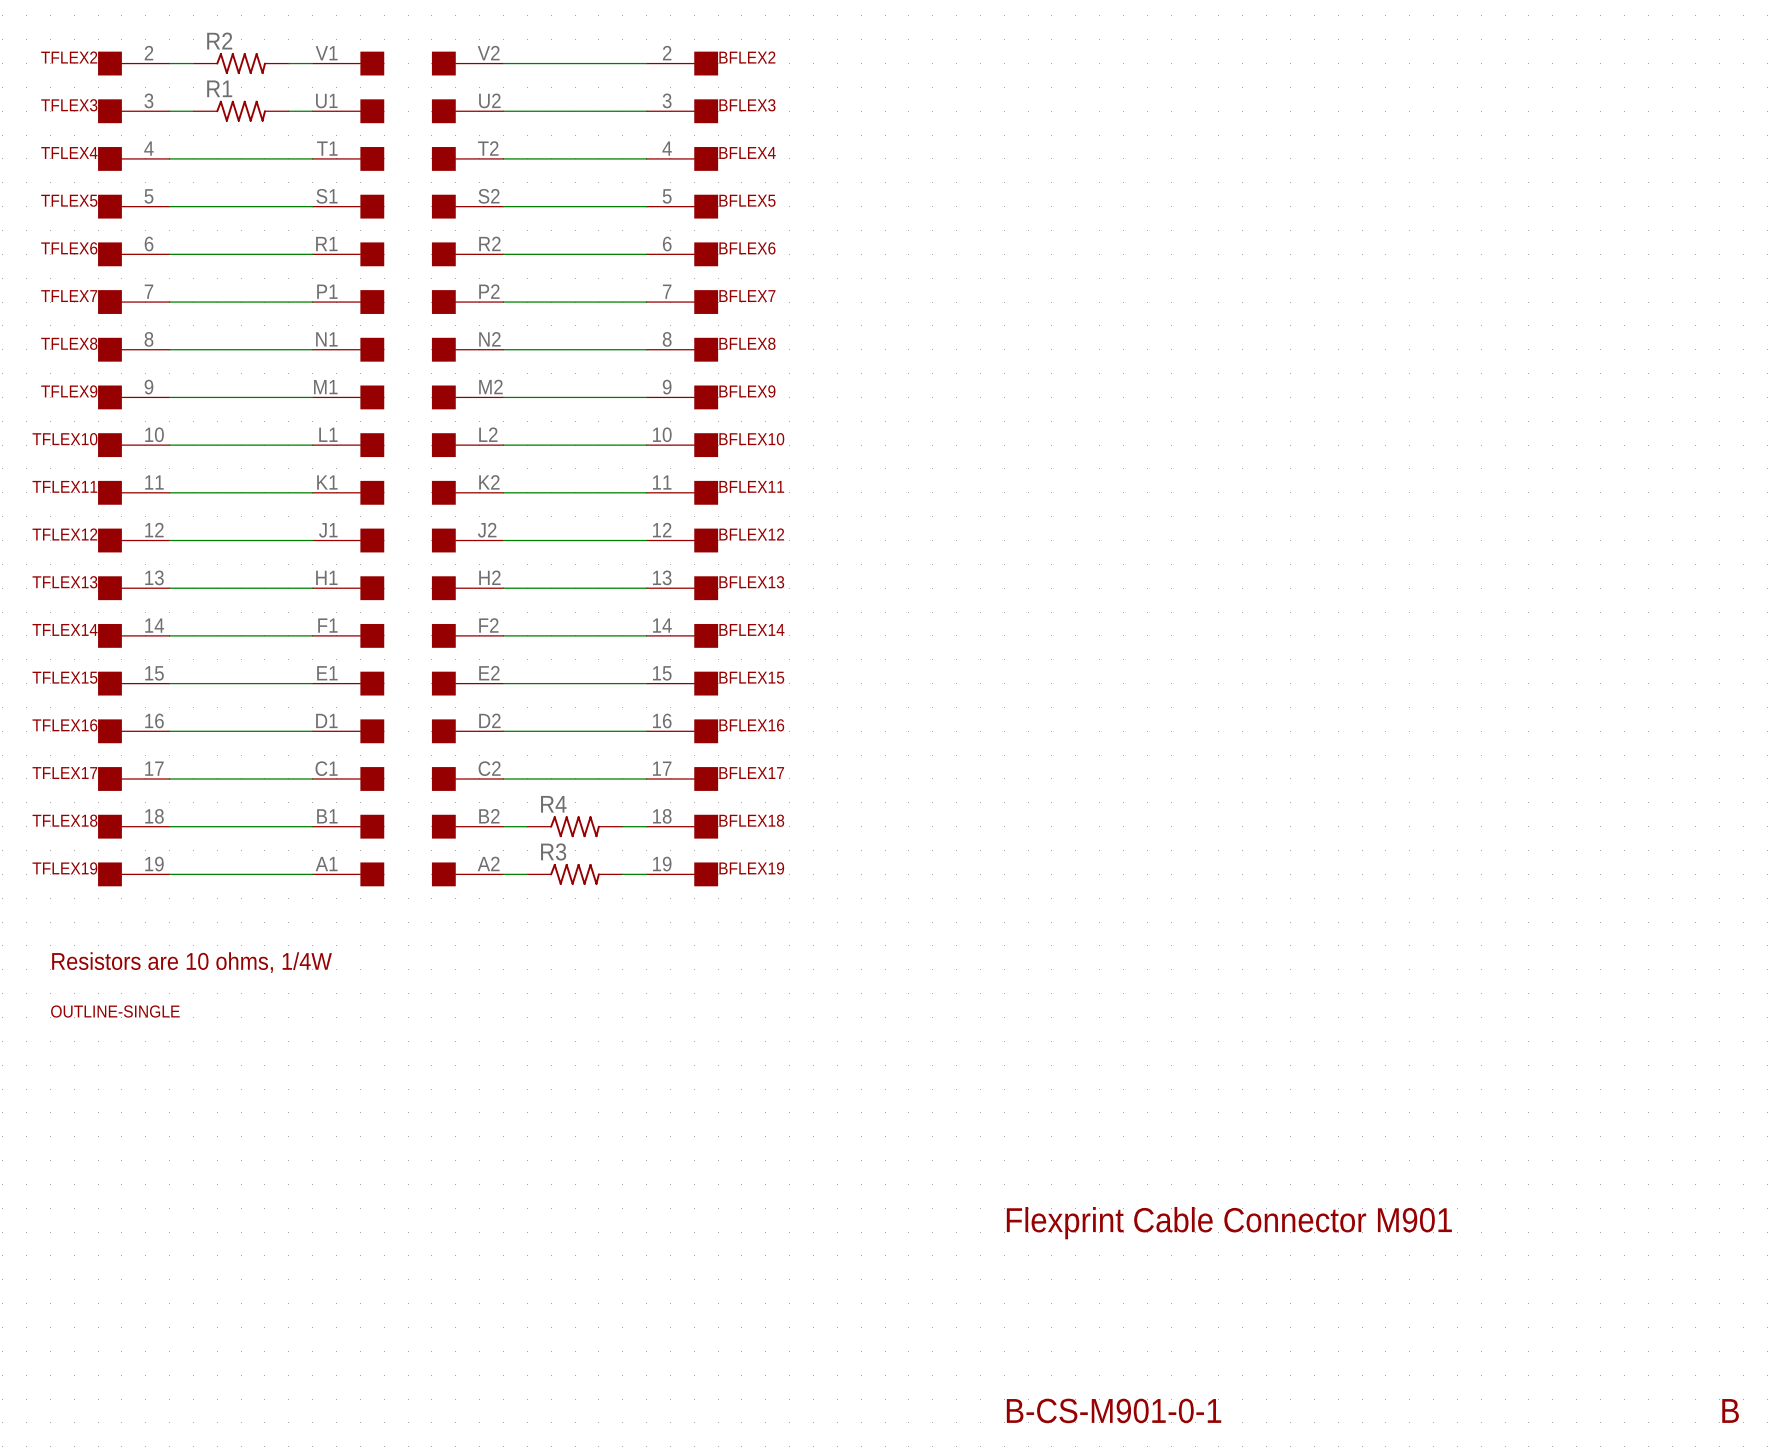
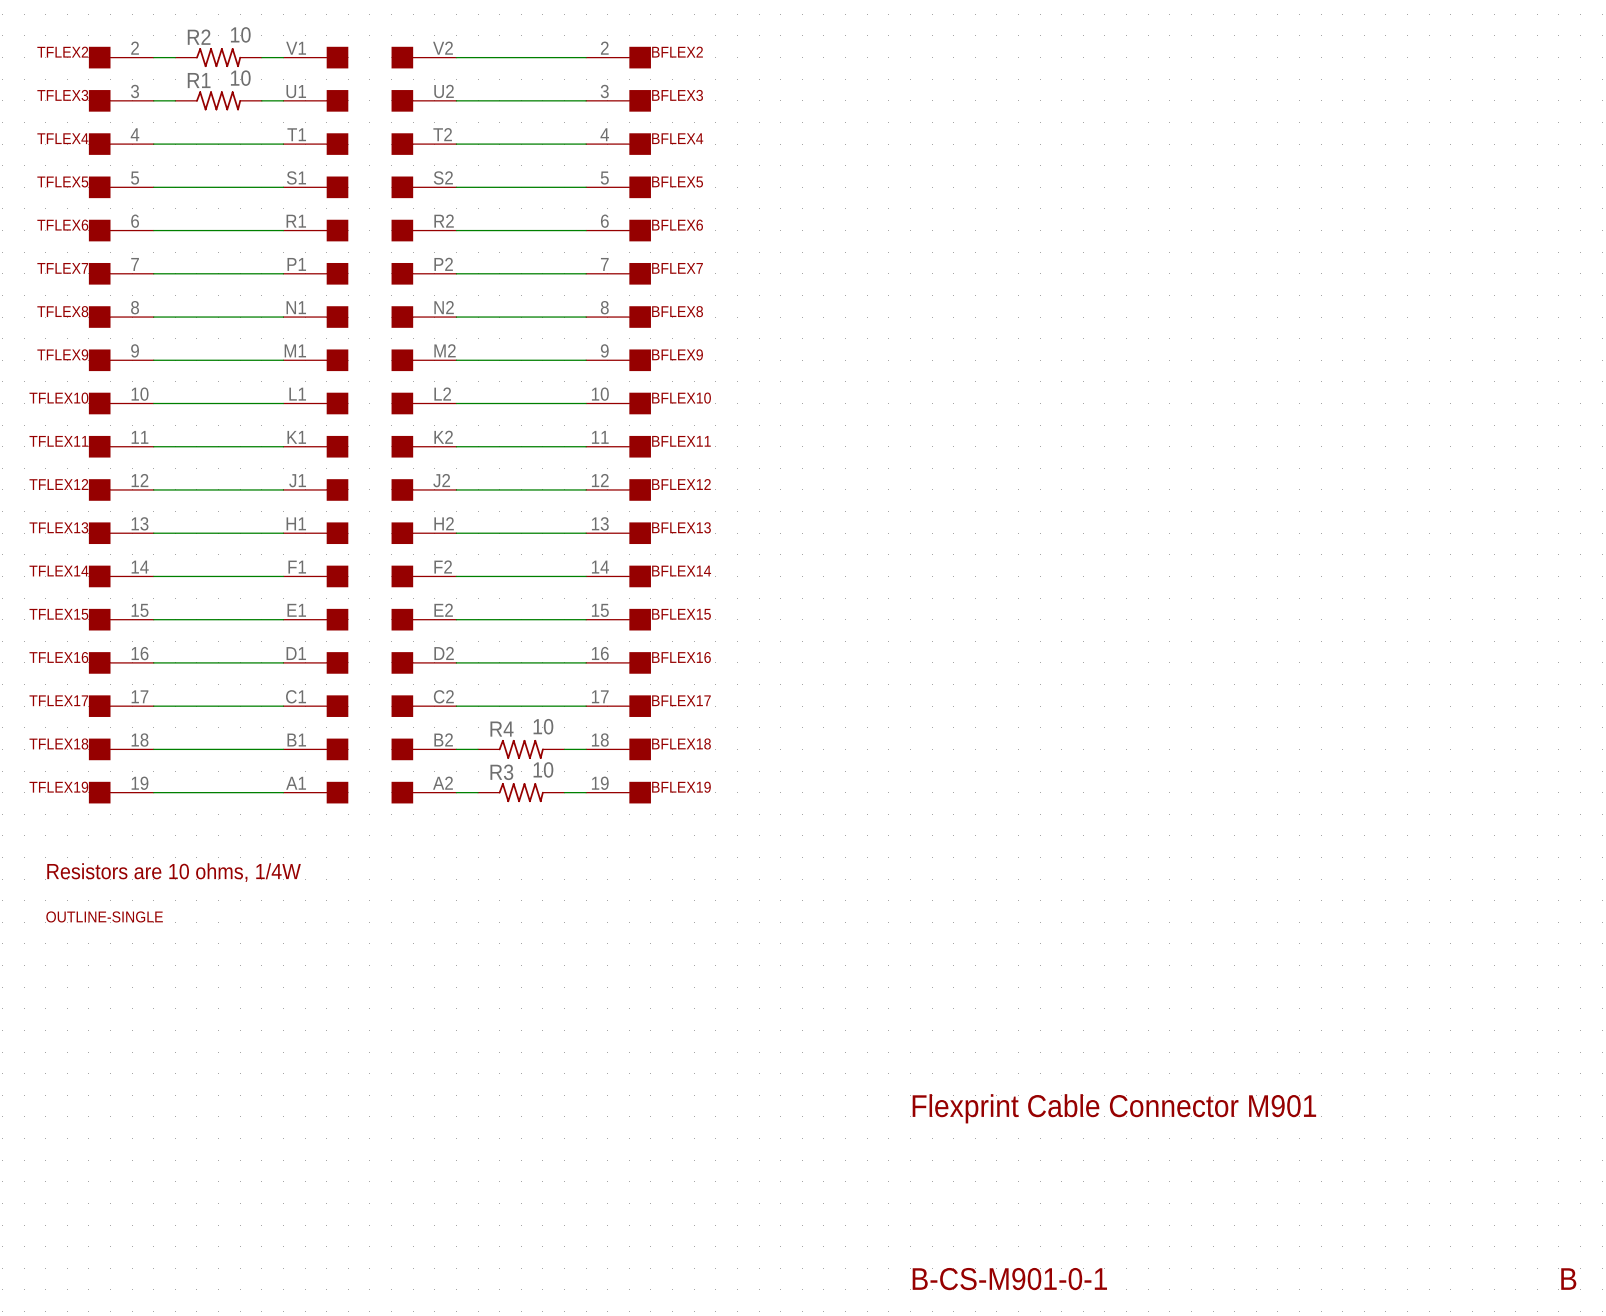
R2 value: none -> 10 (240, 34)
R1 value: none -> 10 (240, 78)
R4 value: none -> 10 (543, 726)
R3 value: none -> 10 (543, 769)

